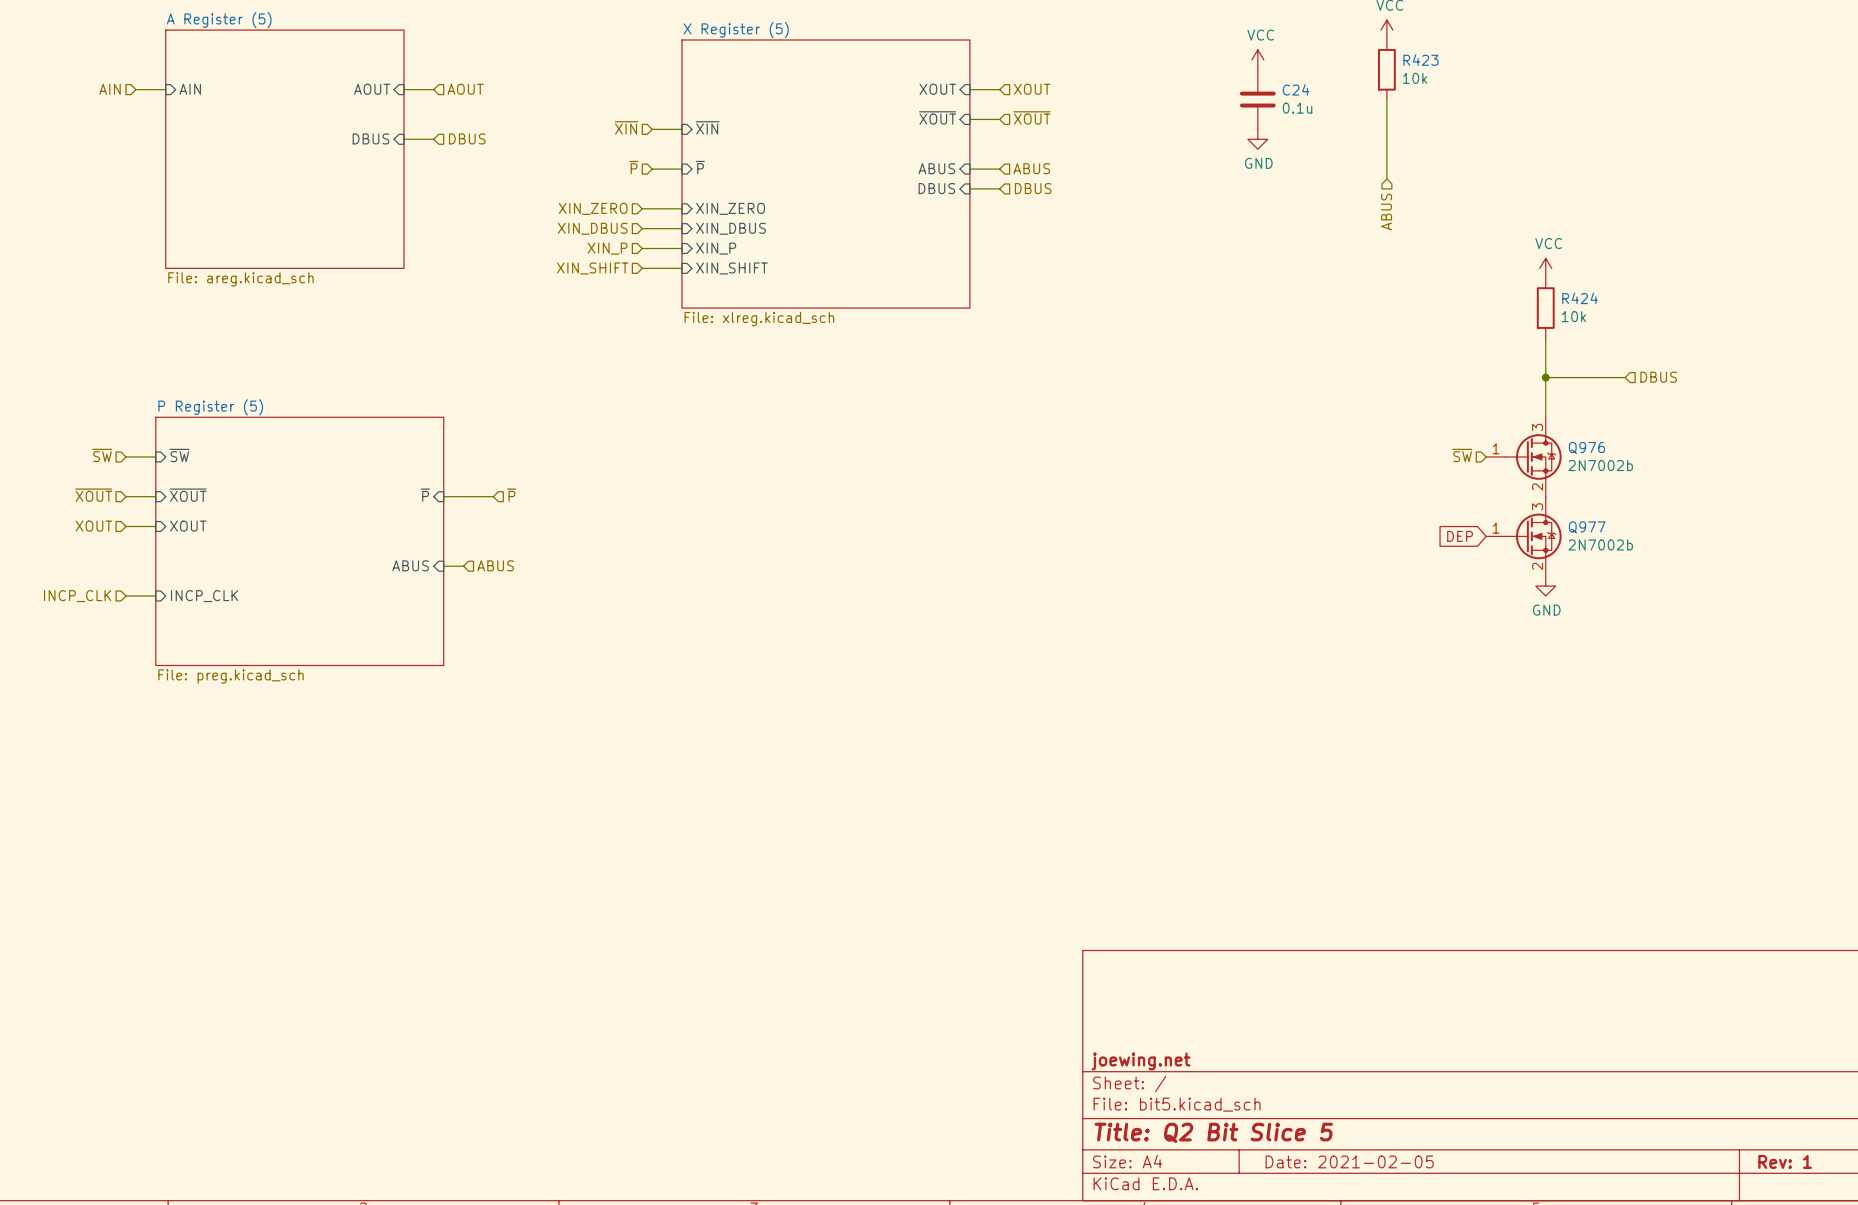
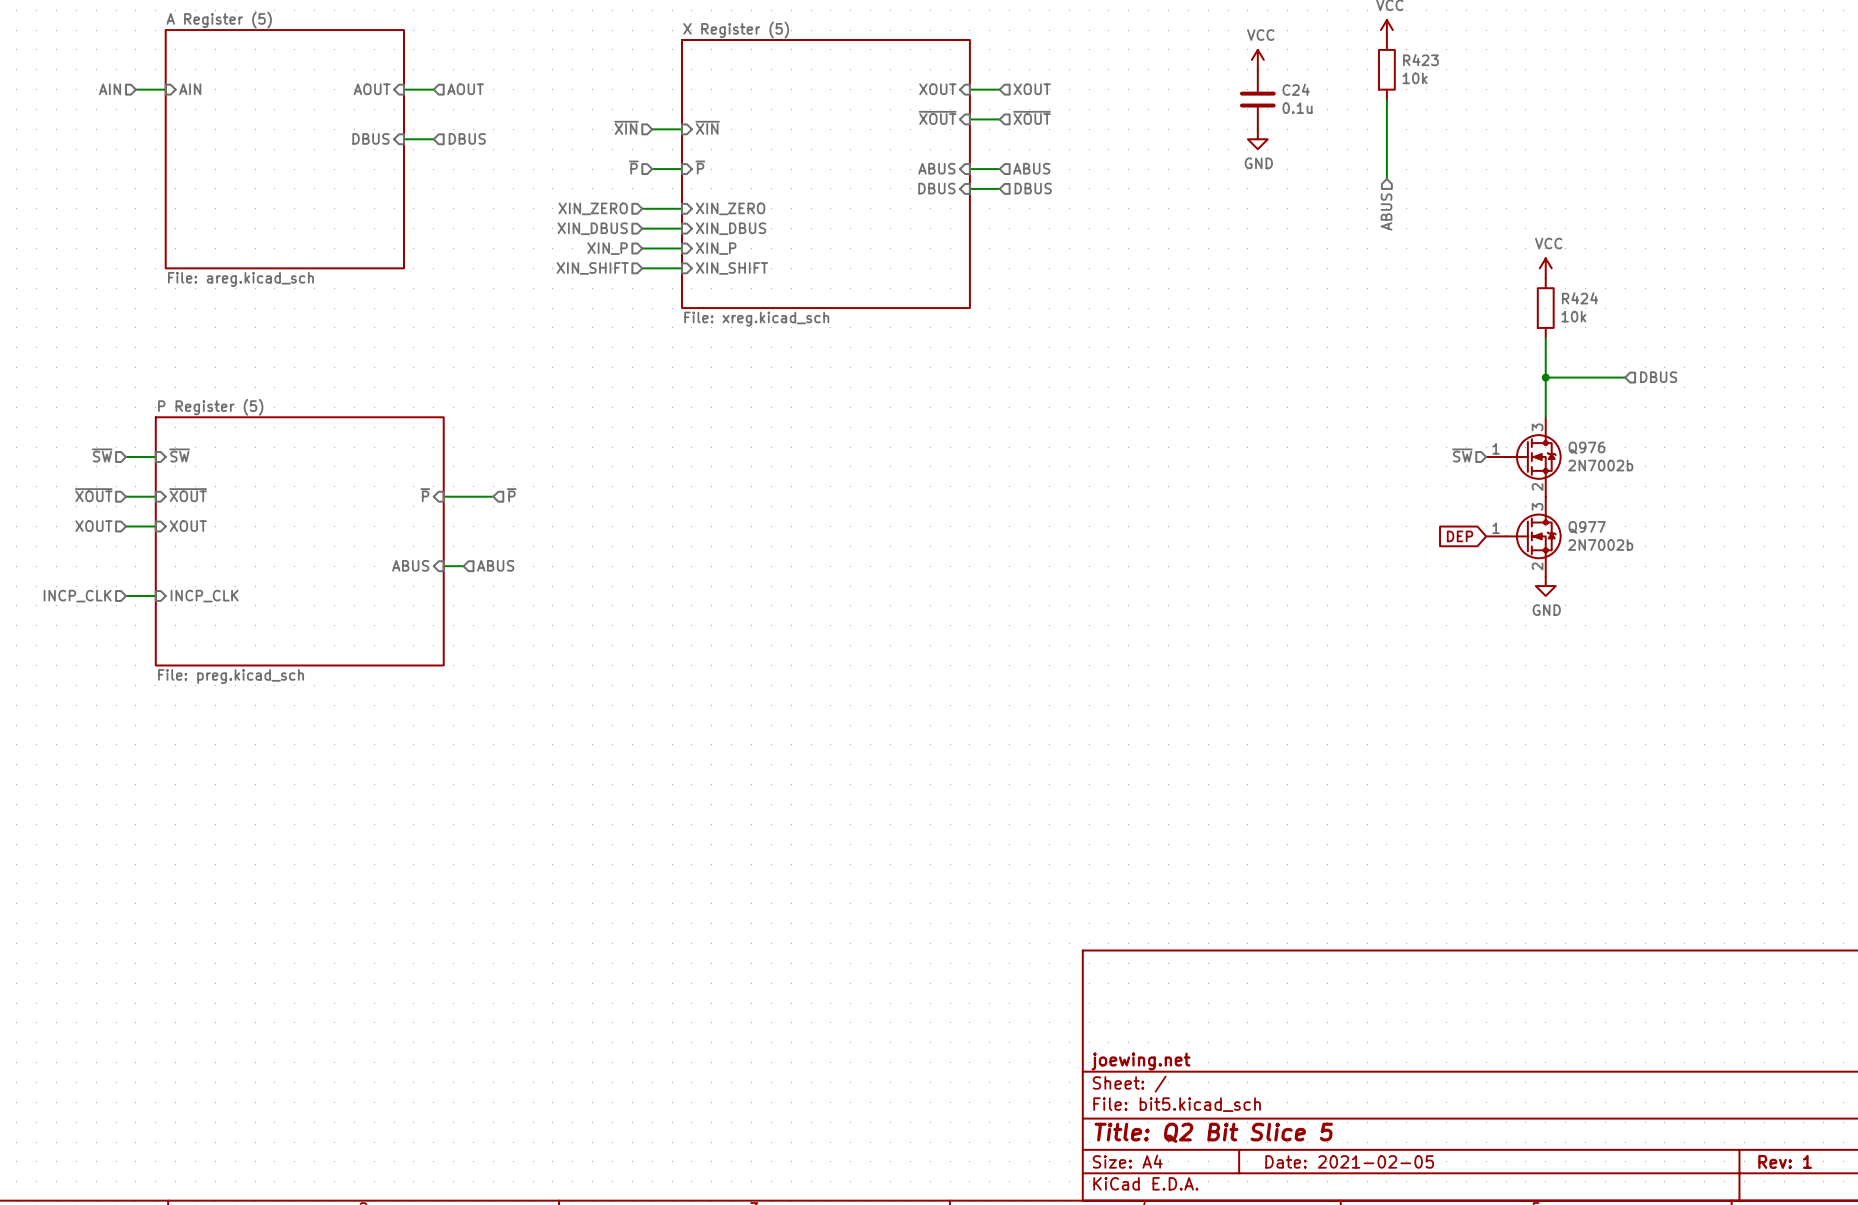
sheet X Register (5) value: File: xlreg.kicad_sch (759, 319) -> File: xreg.kicad_sch (756, 319)

